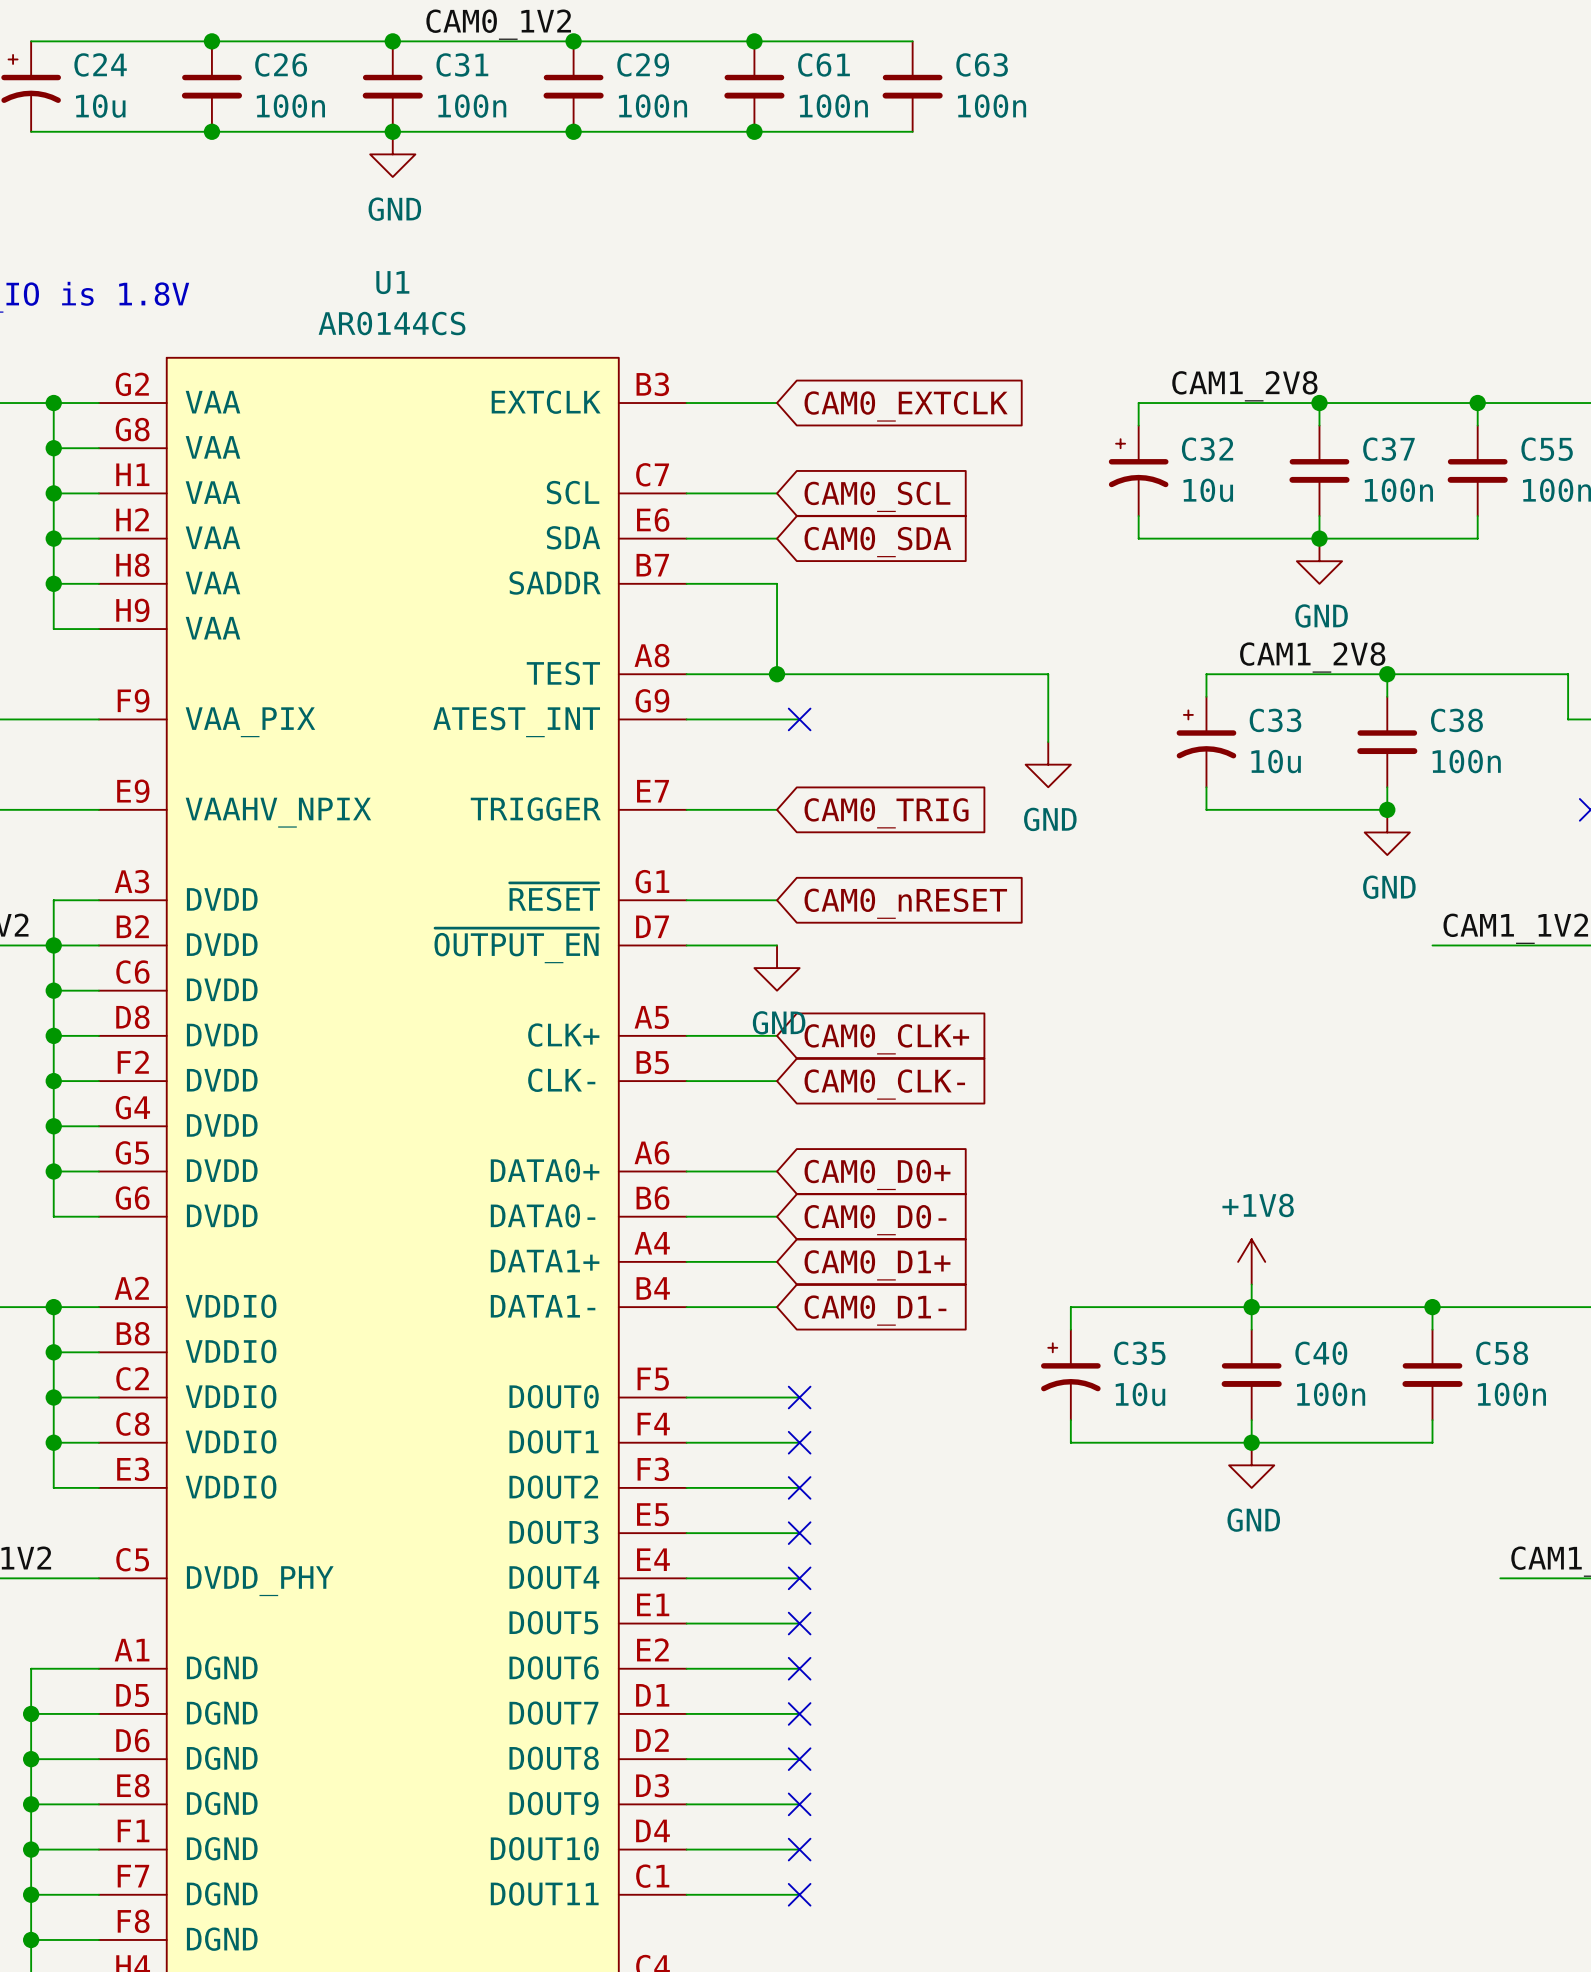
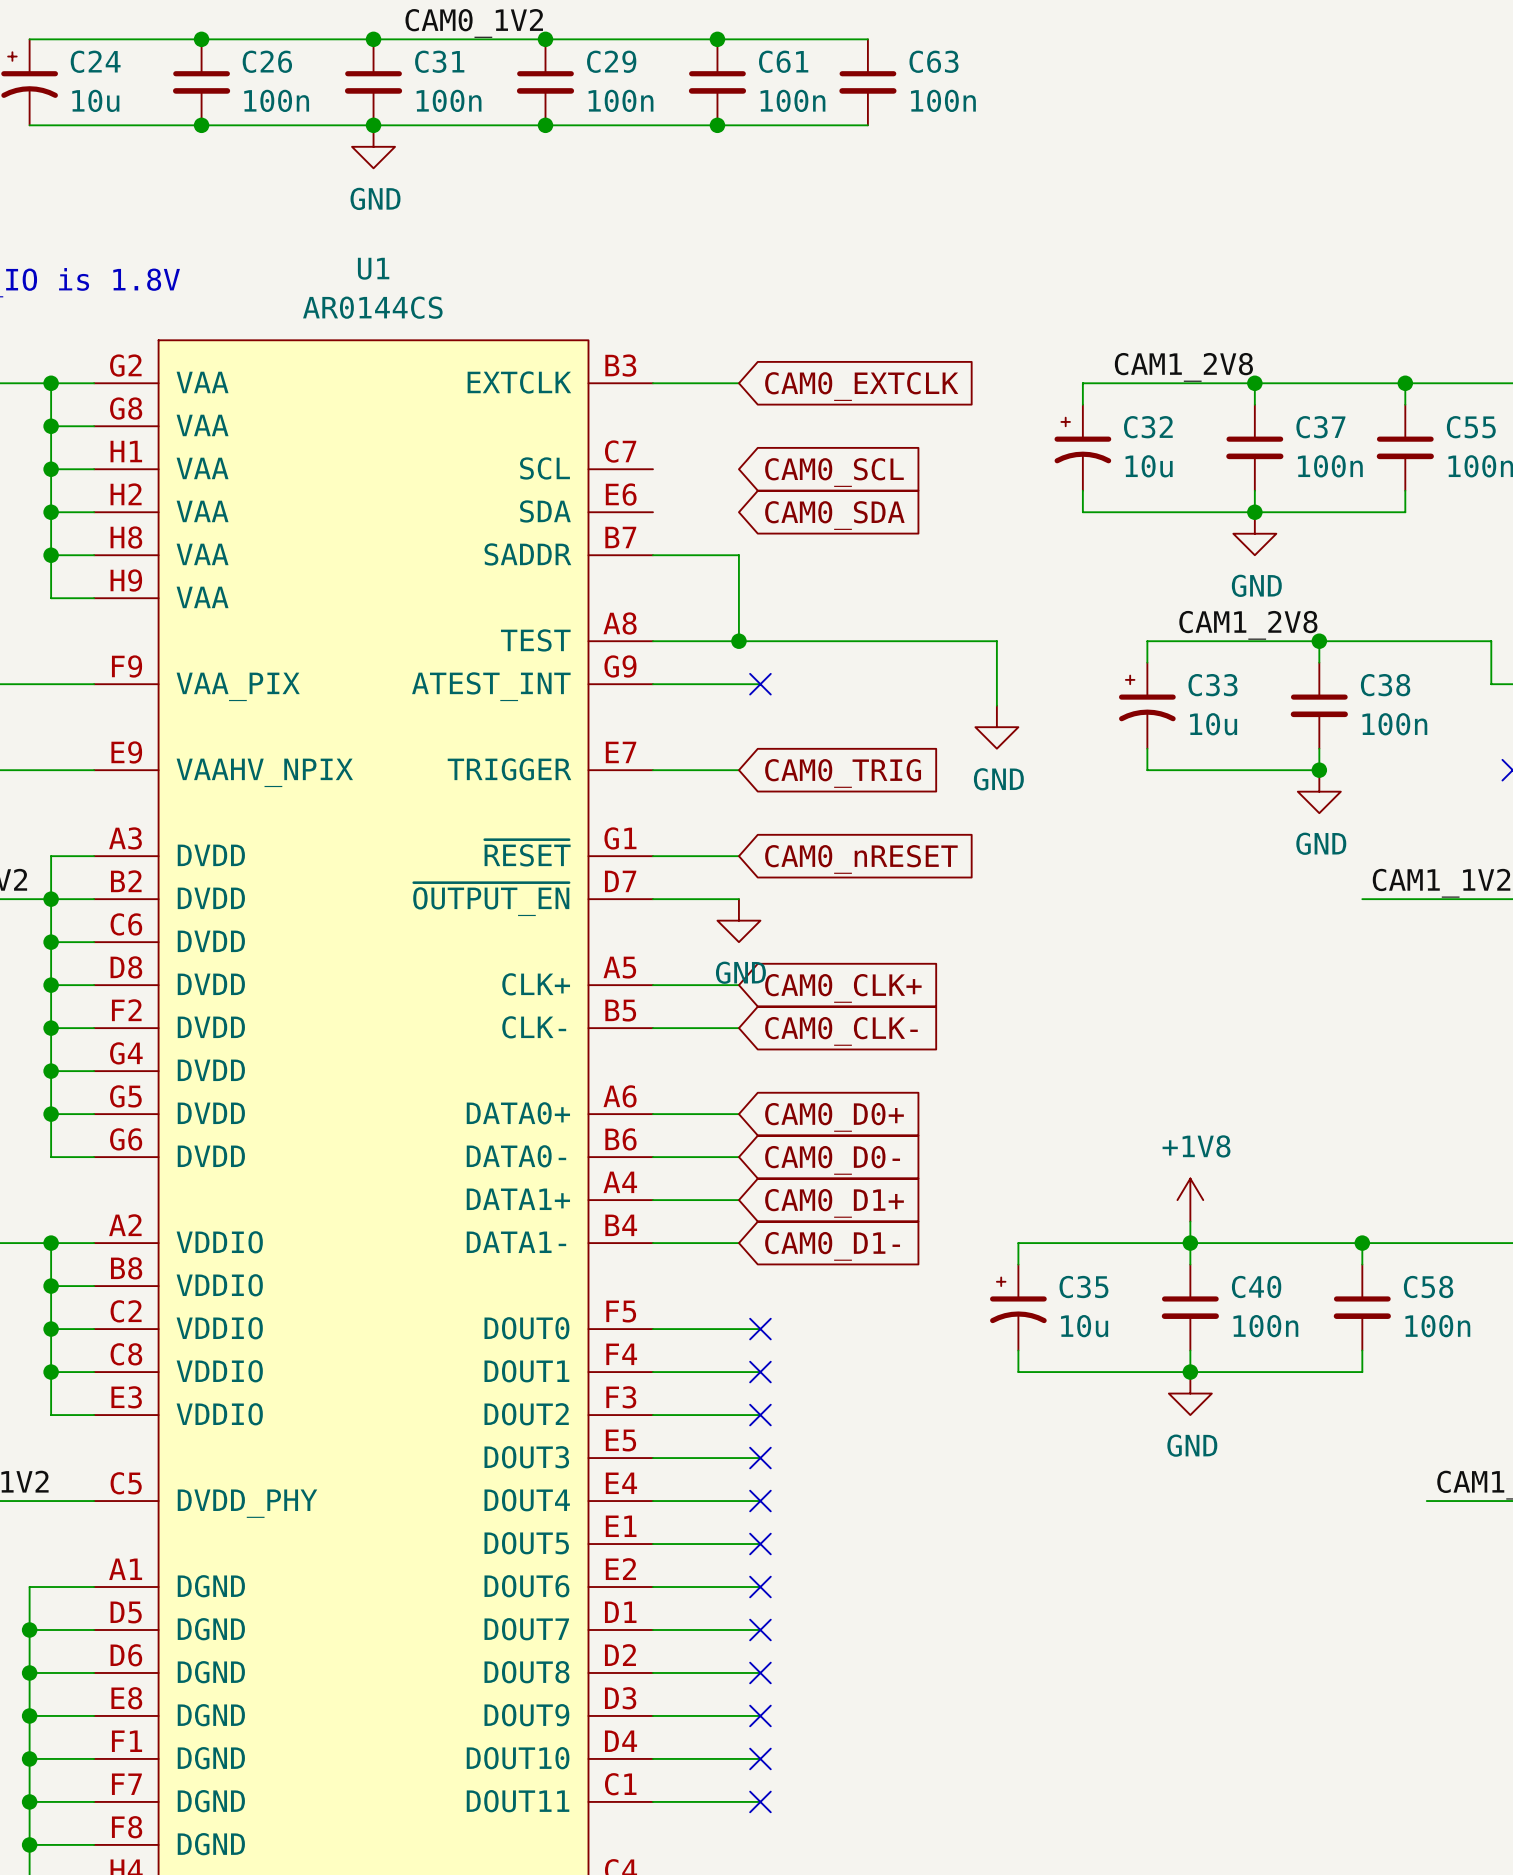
wire: (686, 493) (777, 493) -> none
wire: (686, 538) (777, 538) -> none

